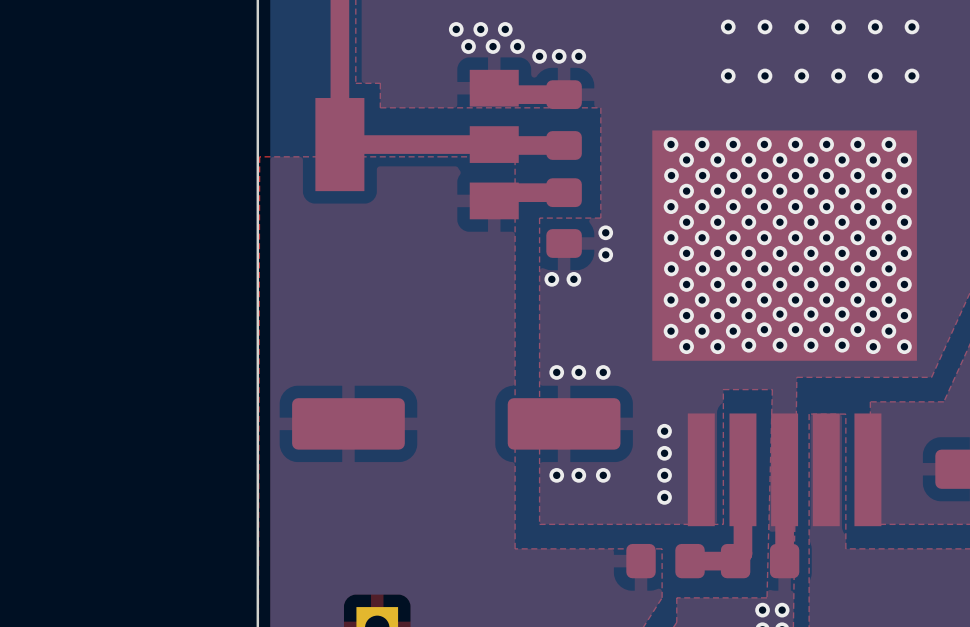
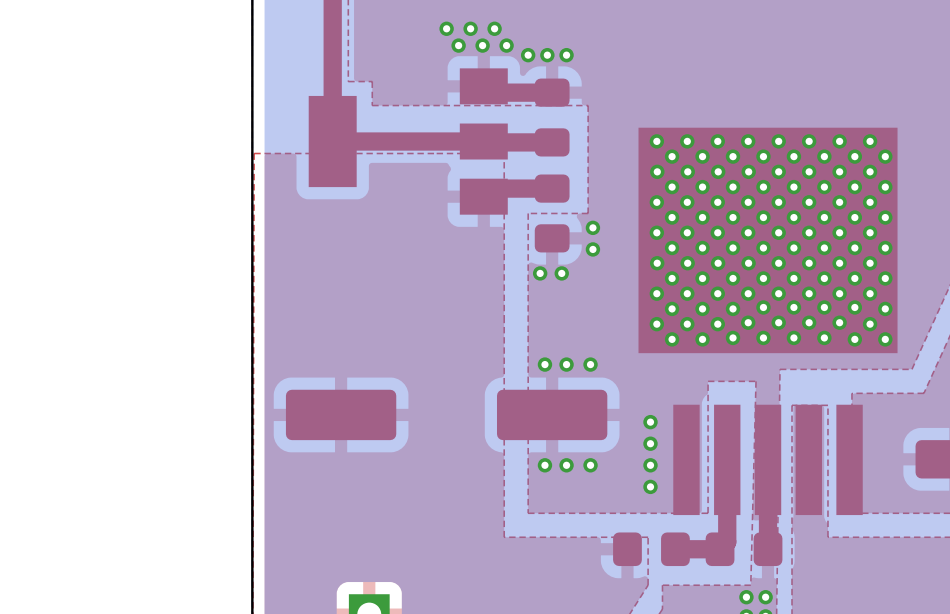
via: (728, 26) -> none
via: (765, 26) -> none
via: (801, 26) -> none
via: (838, 26) -> none
via: (875, 26) -> none
via: (912, 26) -> none
via: (728, 75) -> none
via: (765, 75) -> none
via: (801, 75) -> none
via: (838, 75) -> none
via: (875, 75) -> none
via: (912, 75) -> none

